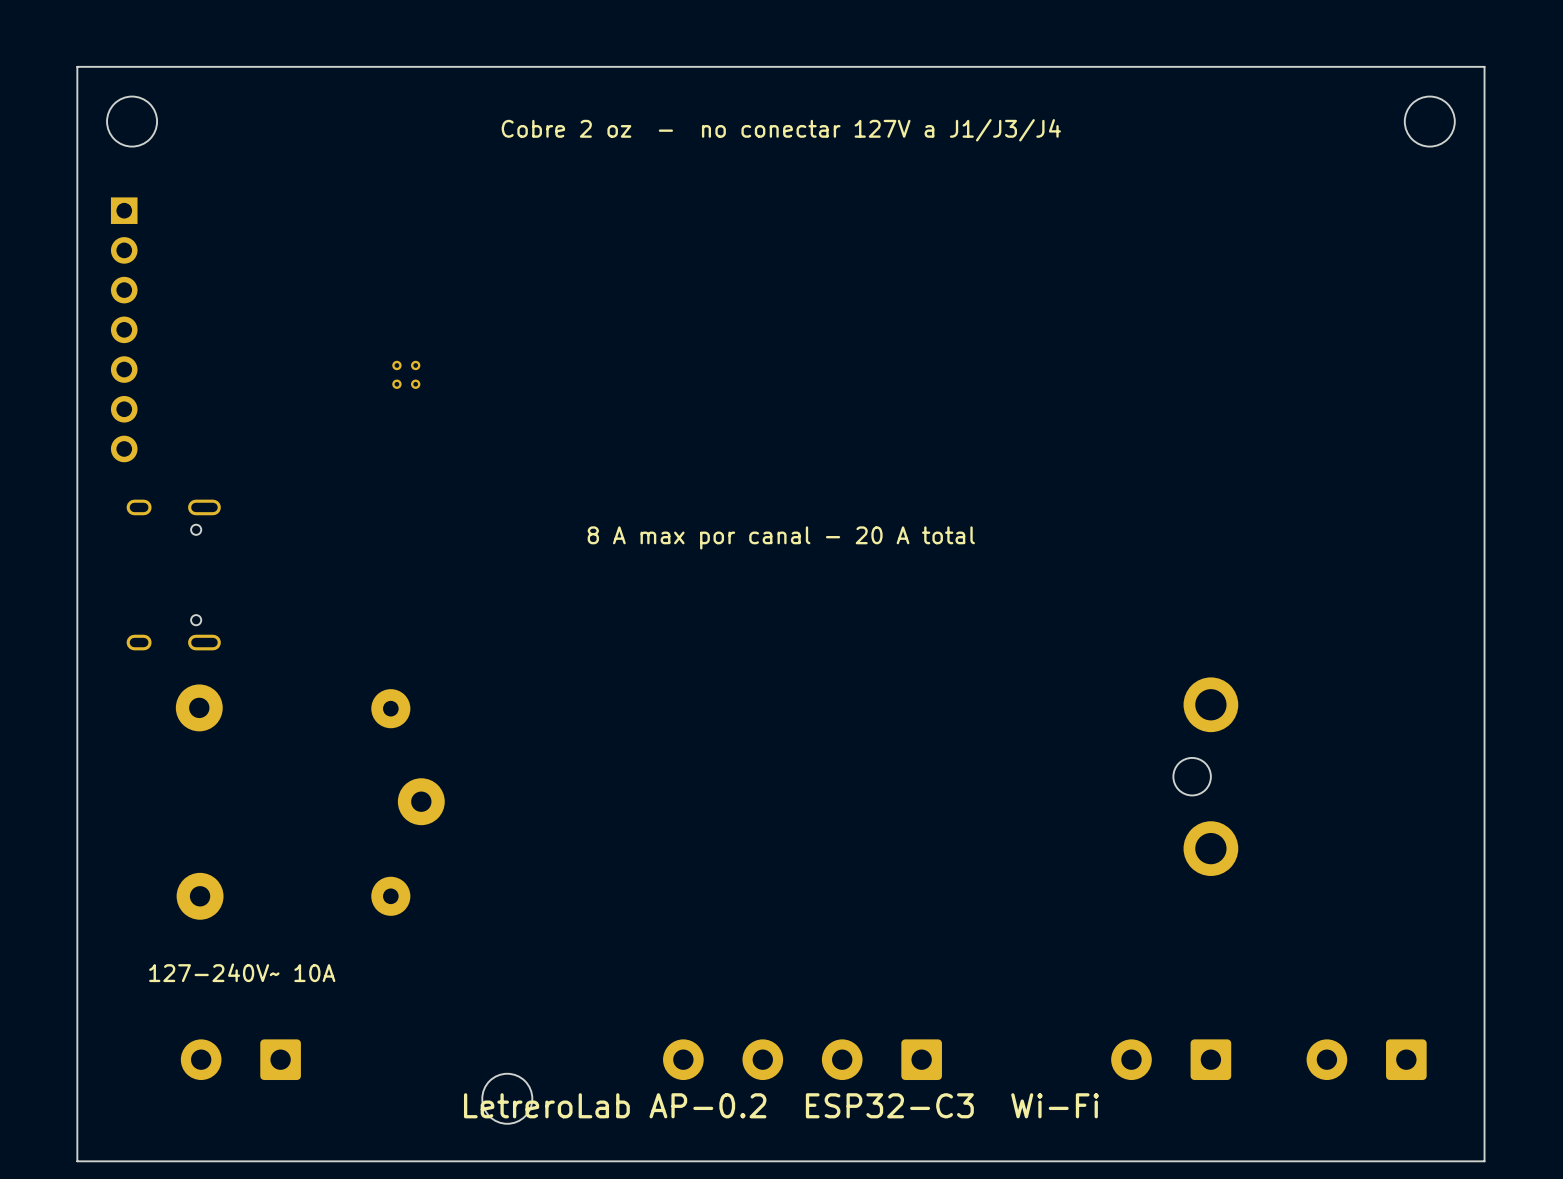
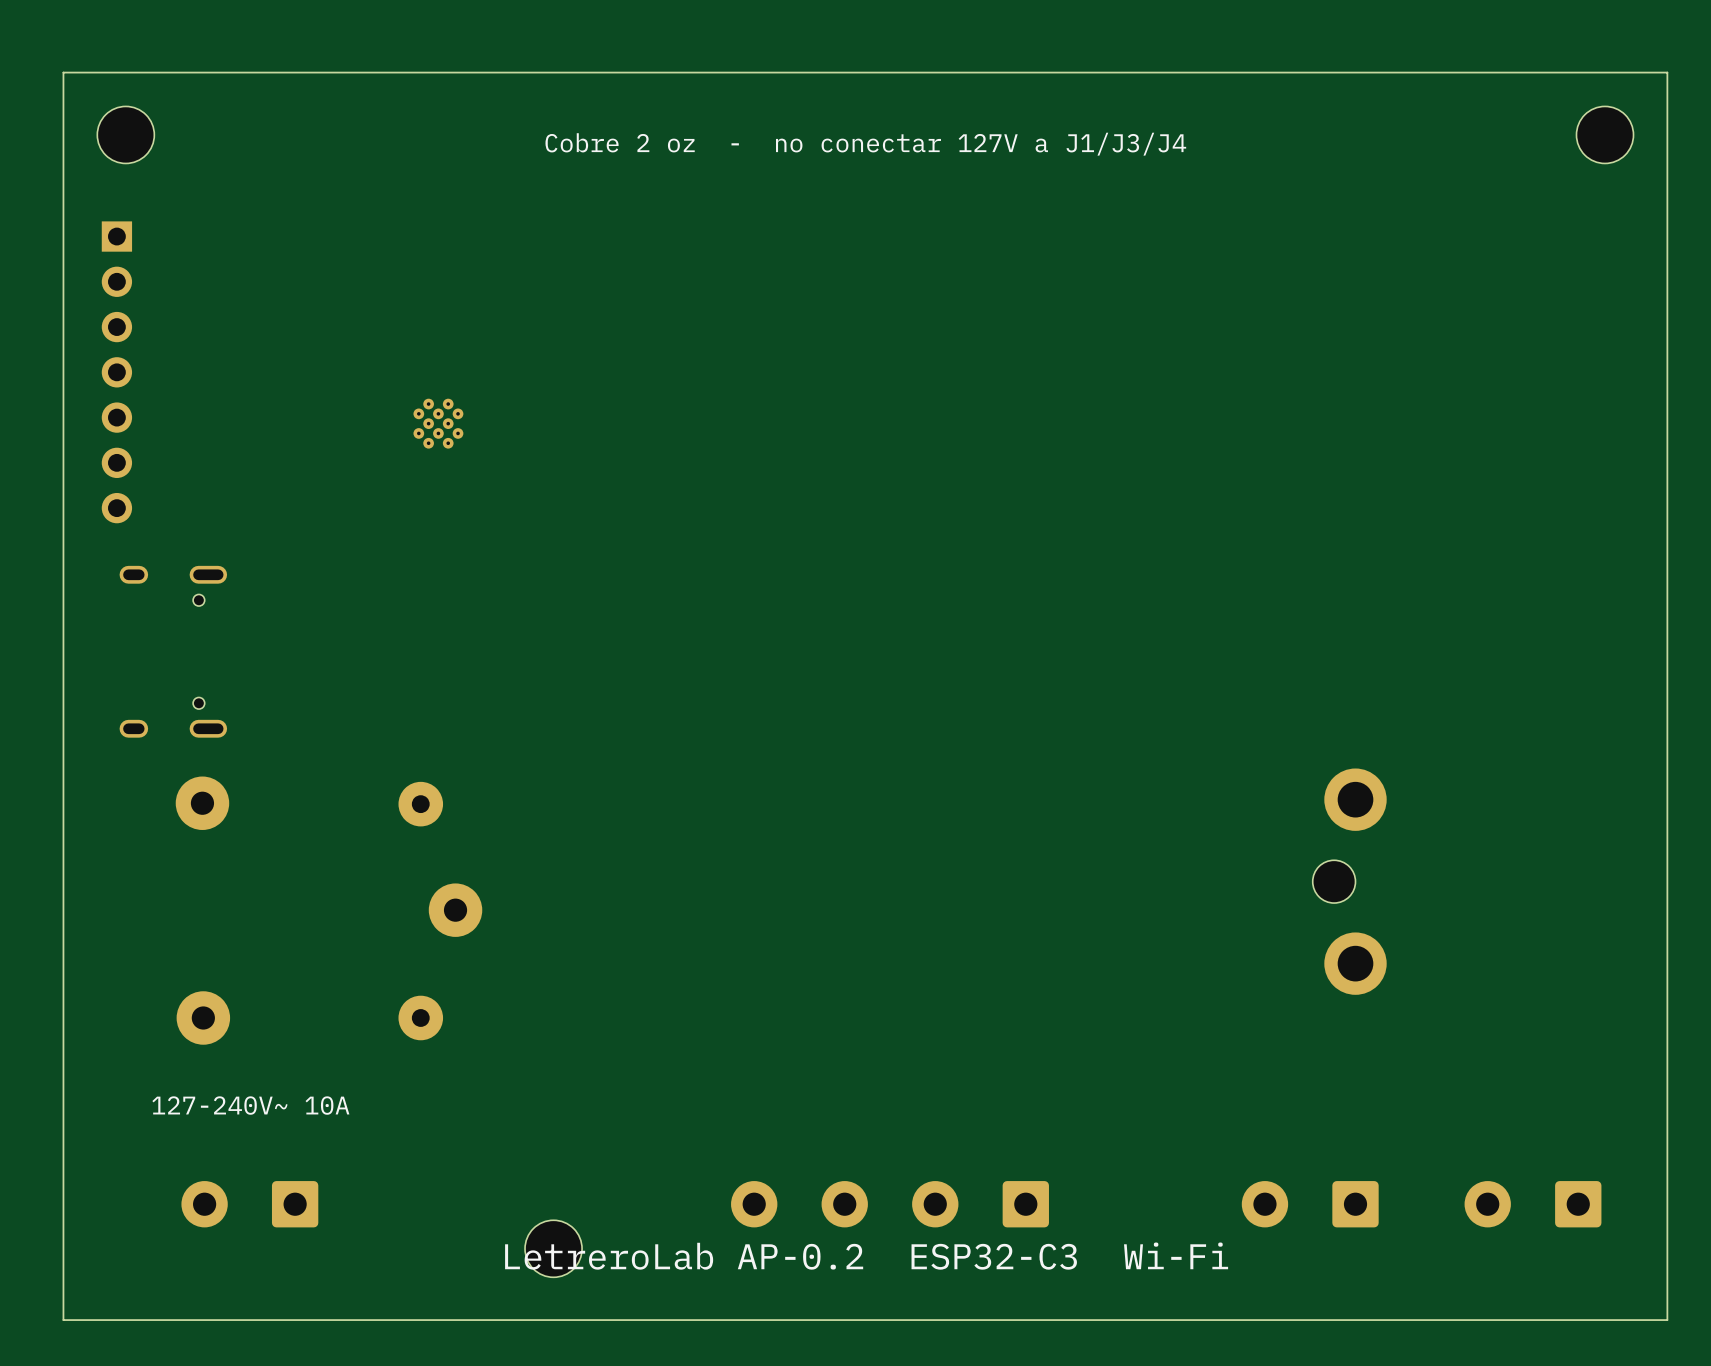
part footprint: [392, 360, 421, 389] -> [413, 398, 464, 449]
text: 8 A max por canal - 20 A total (781, 537) -> none

